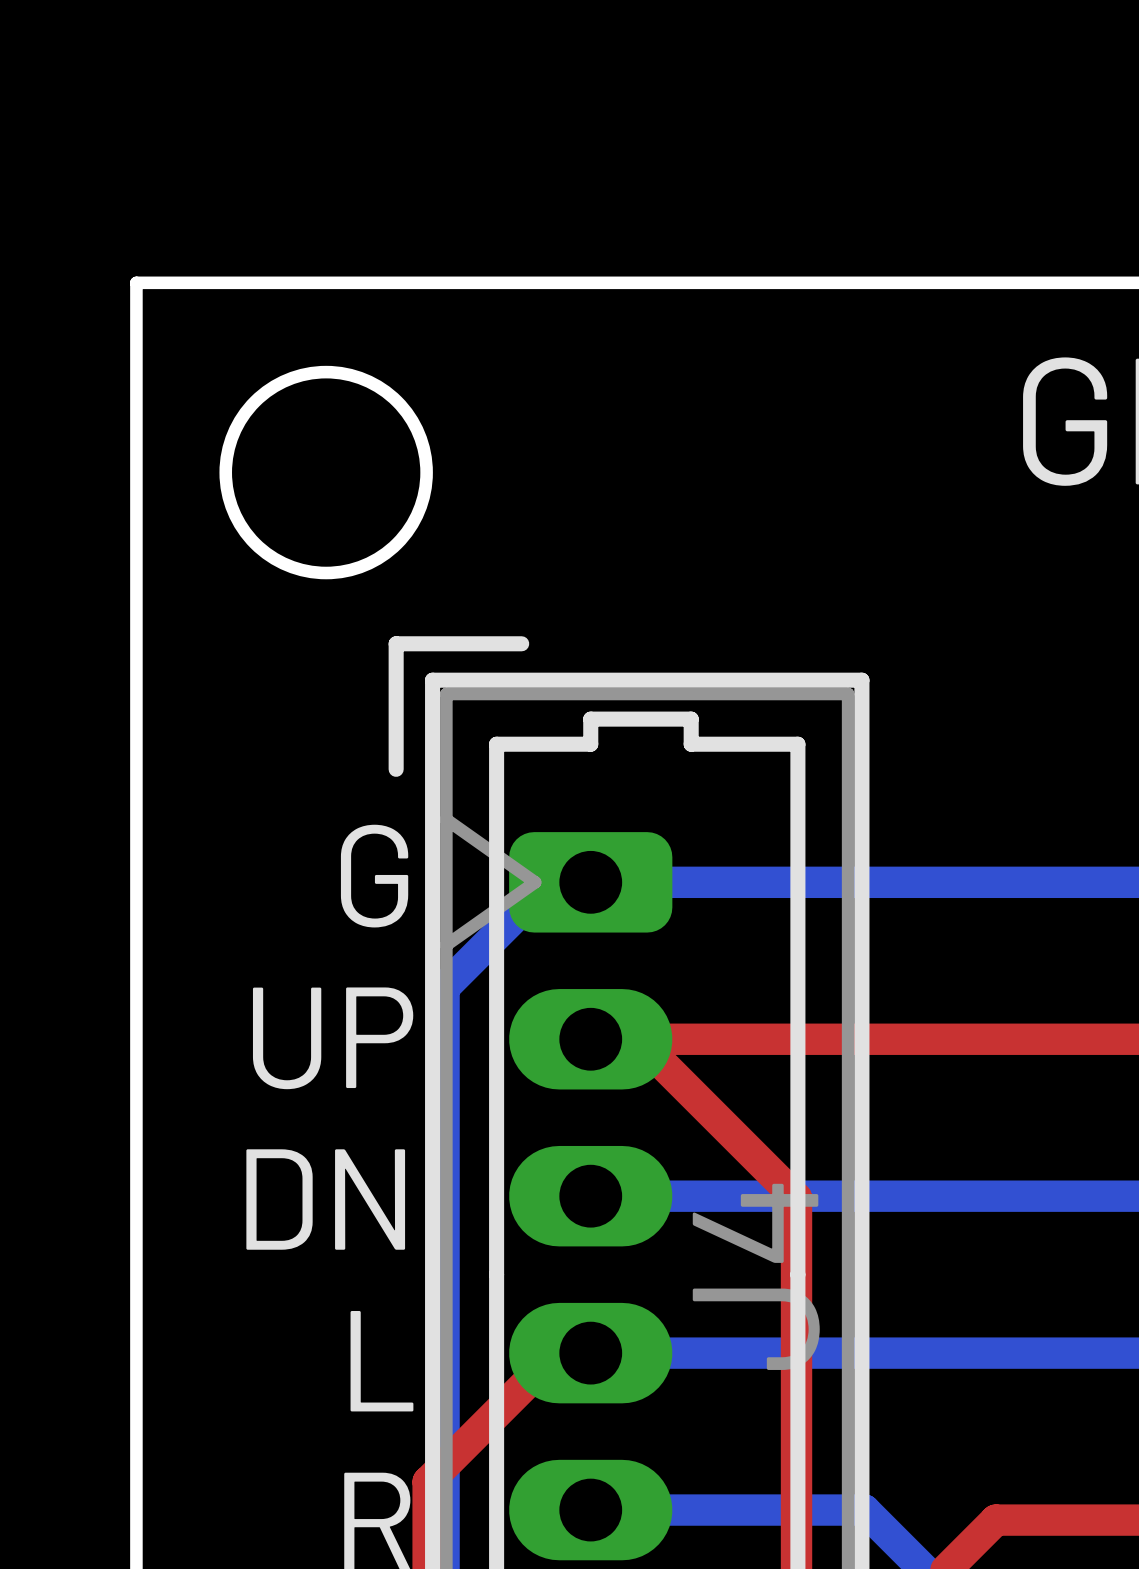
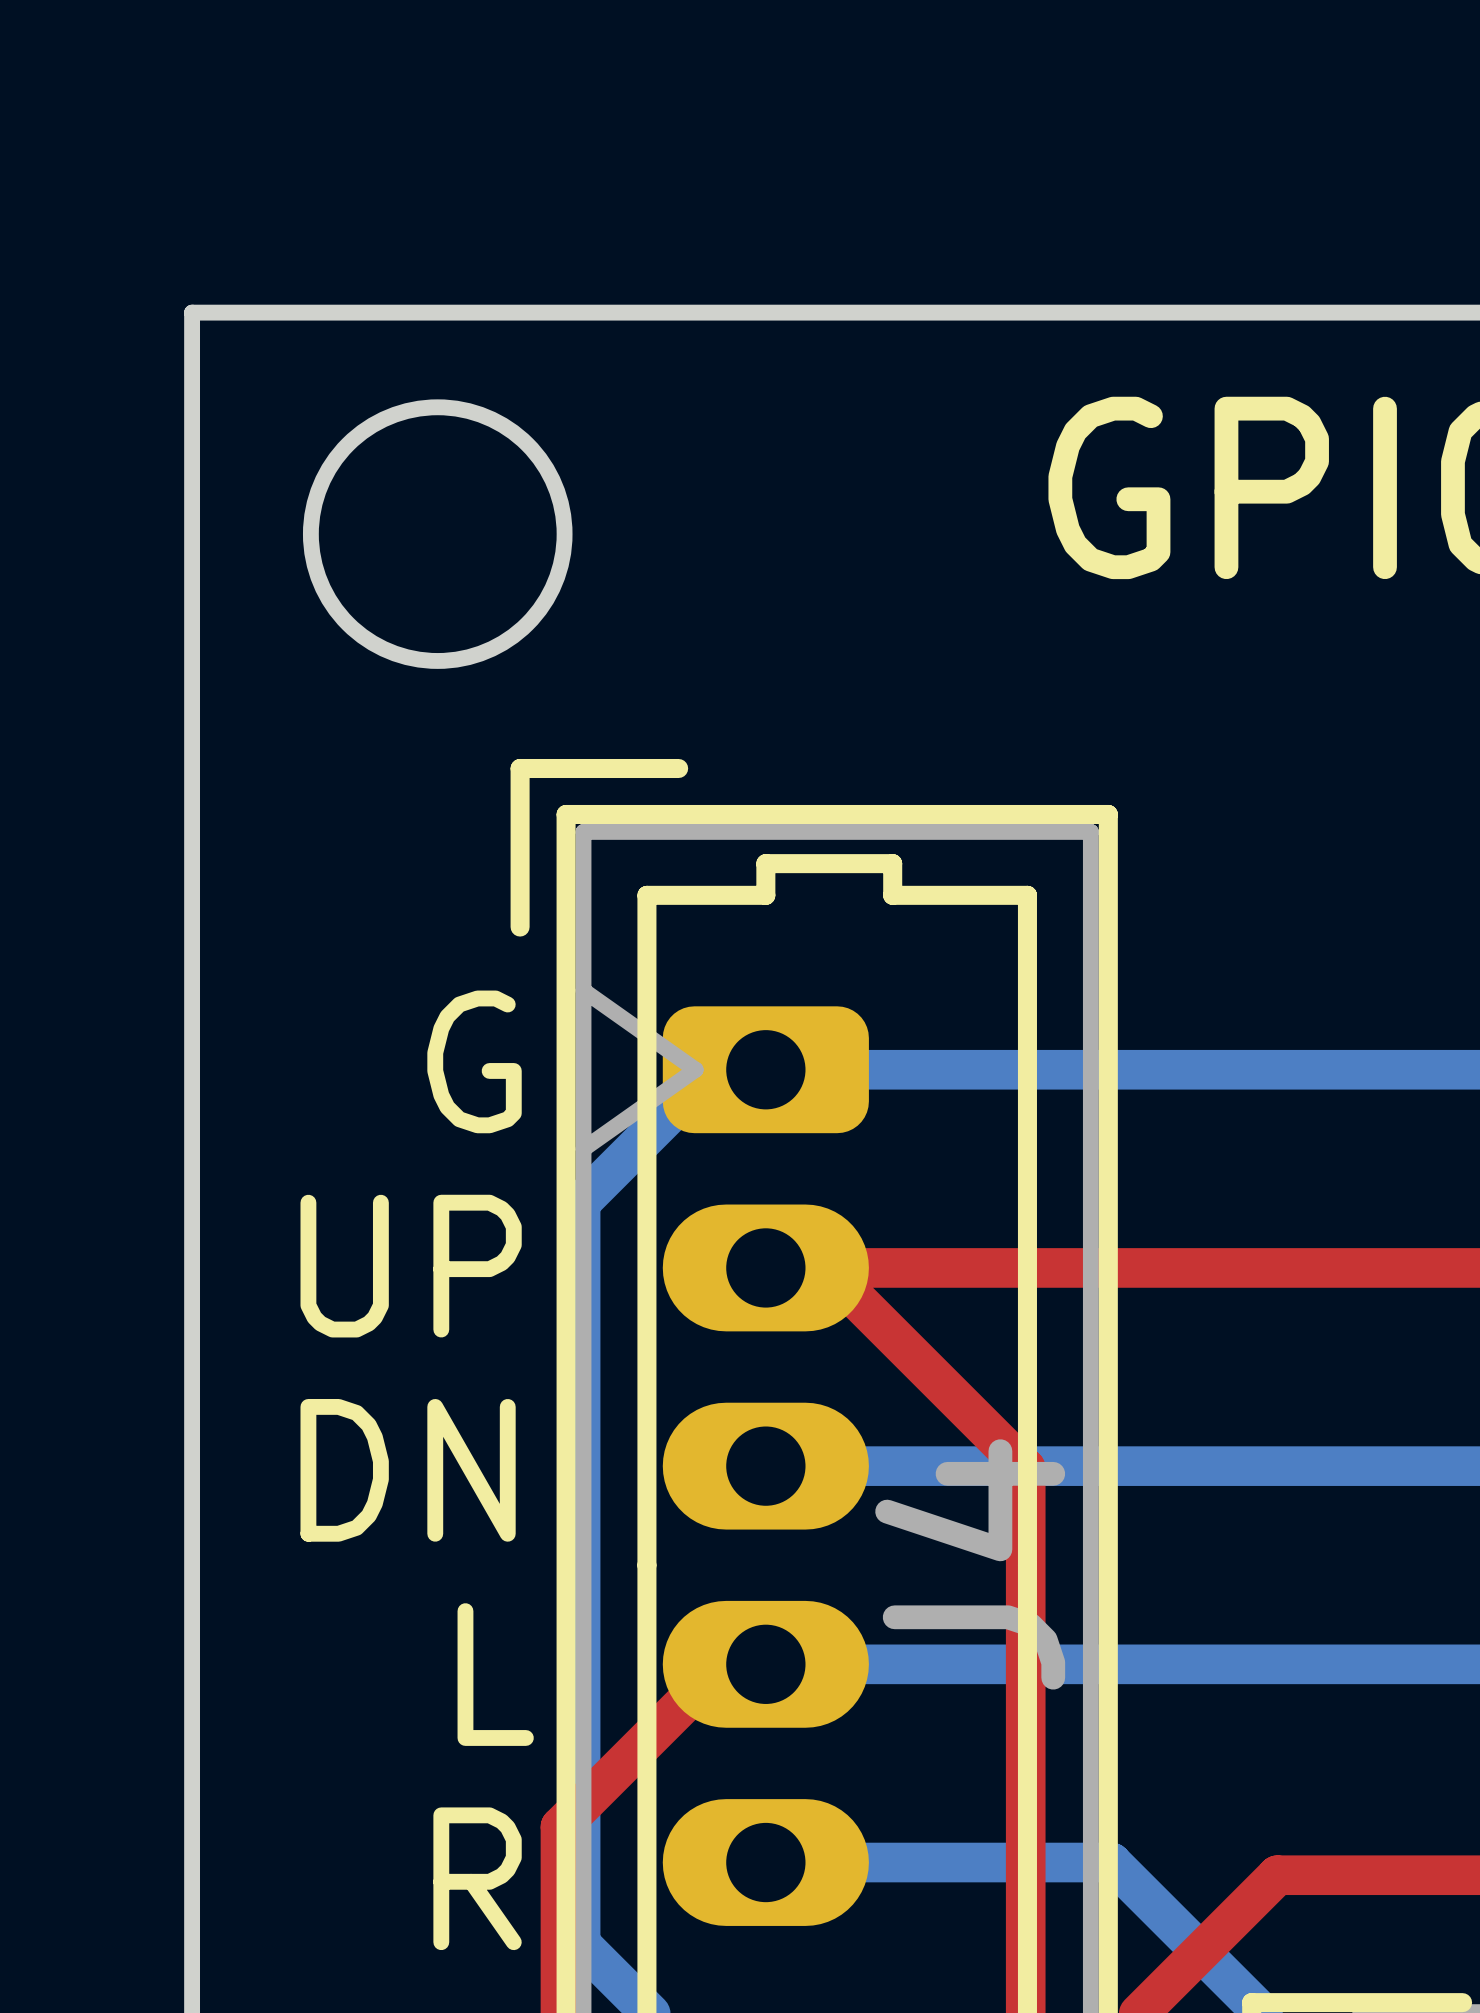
round board edge position: (326, 472) -> (437, 534)

